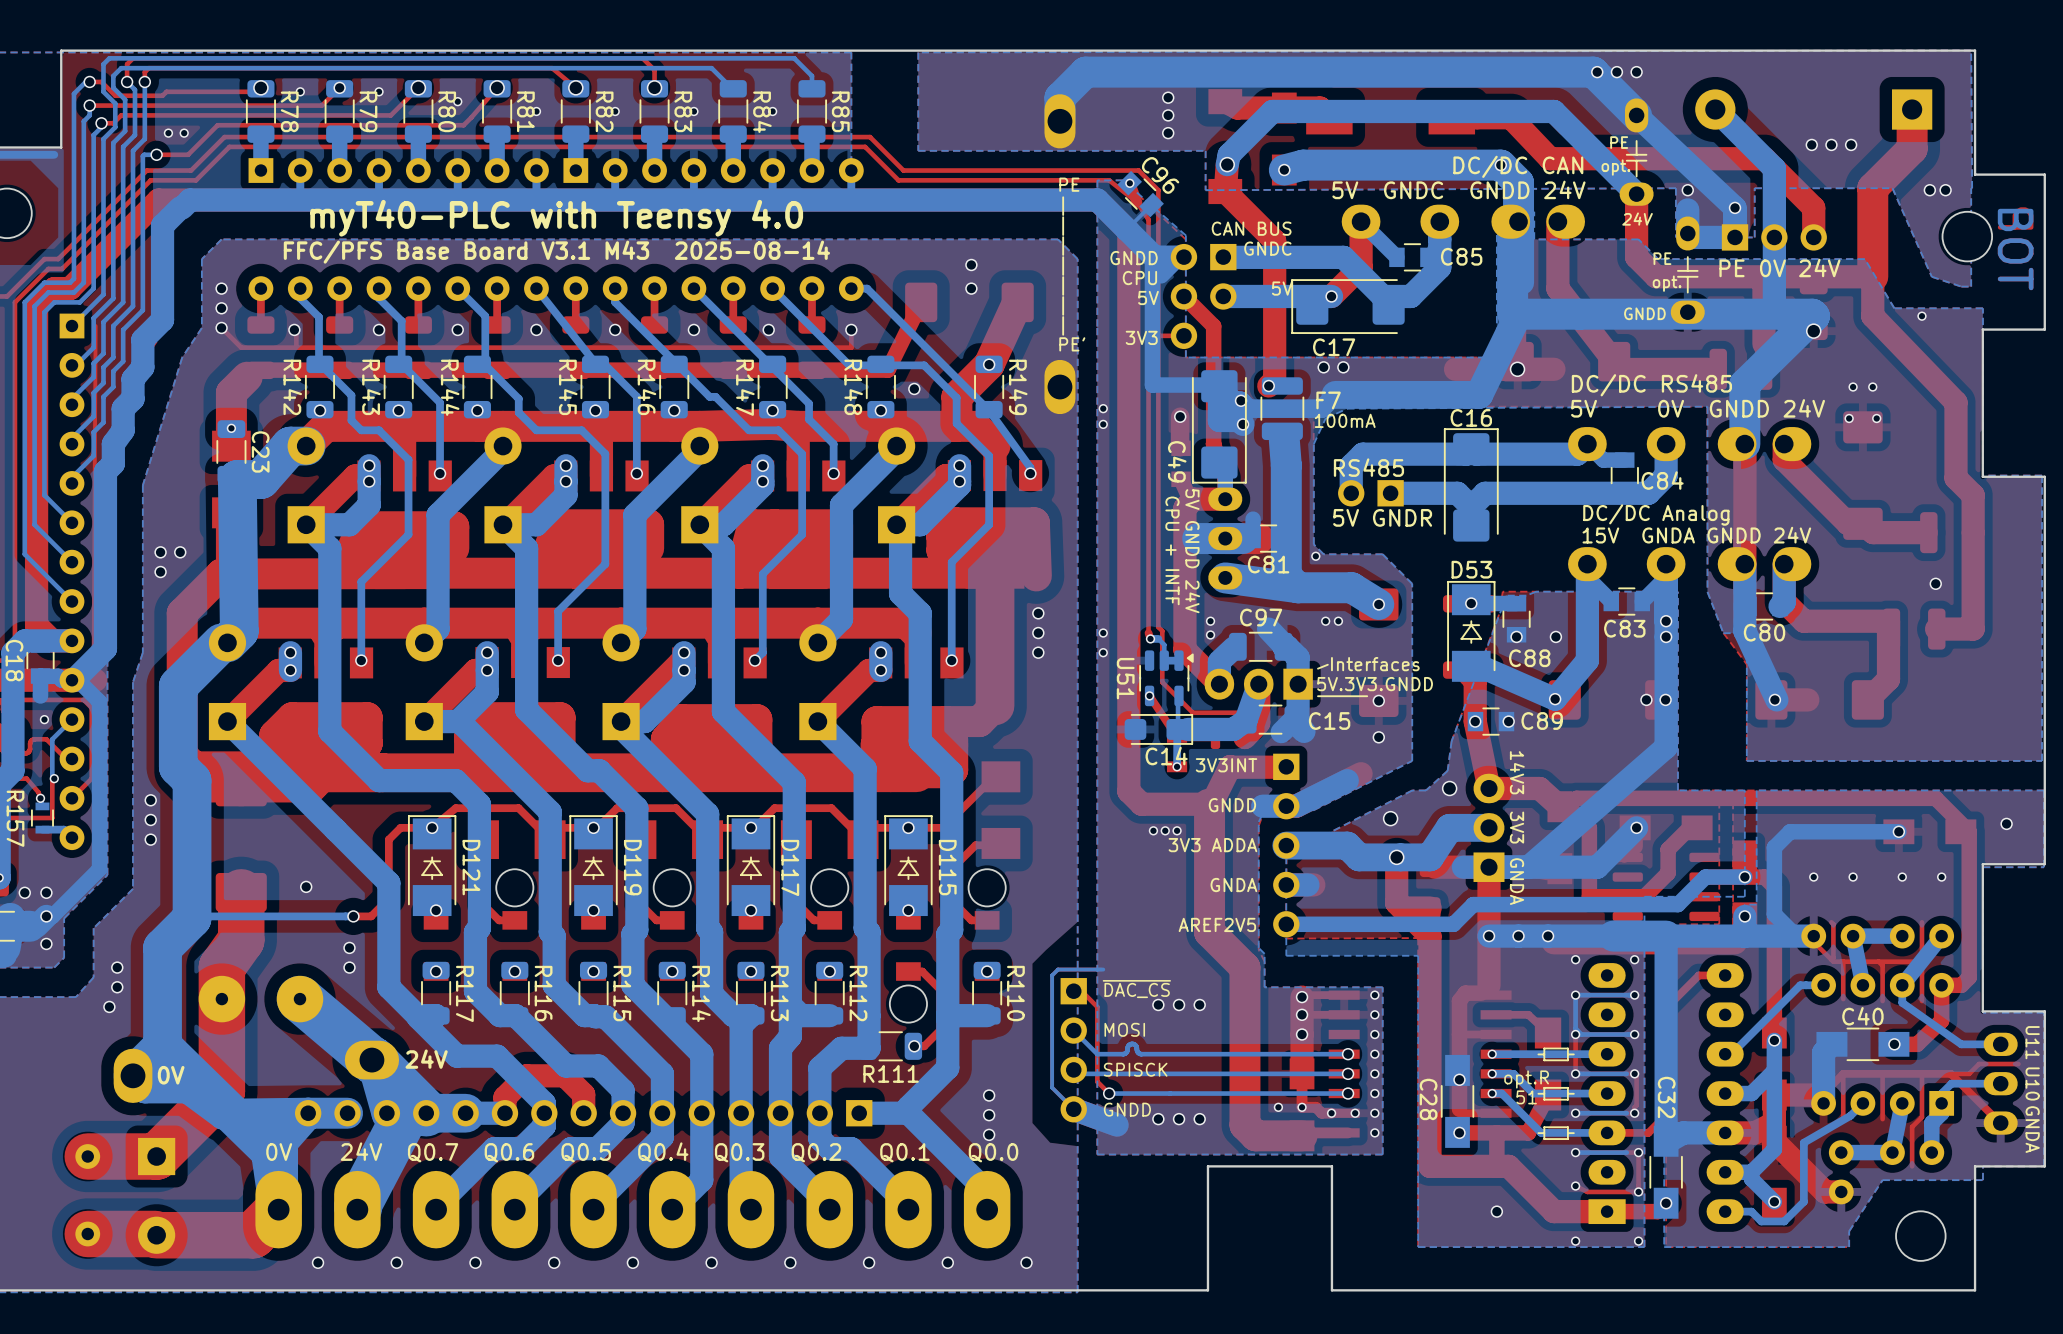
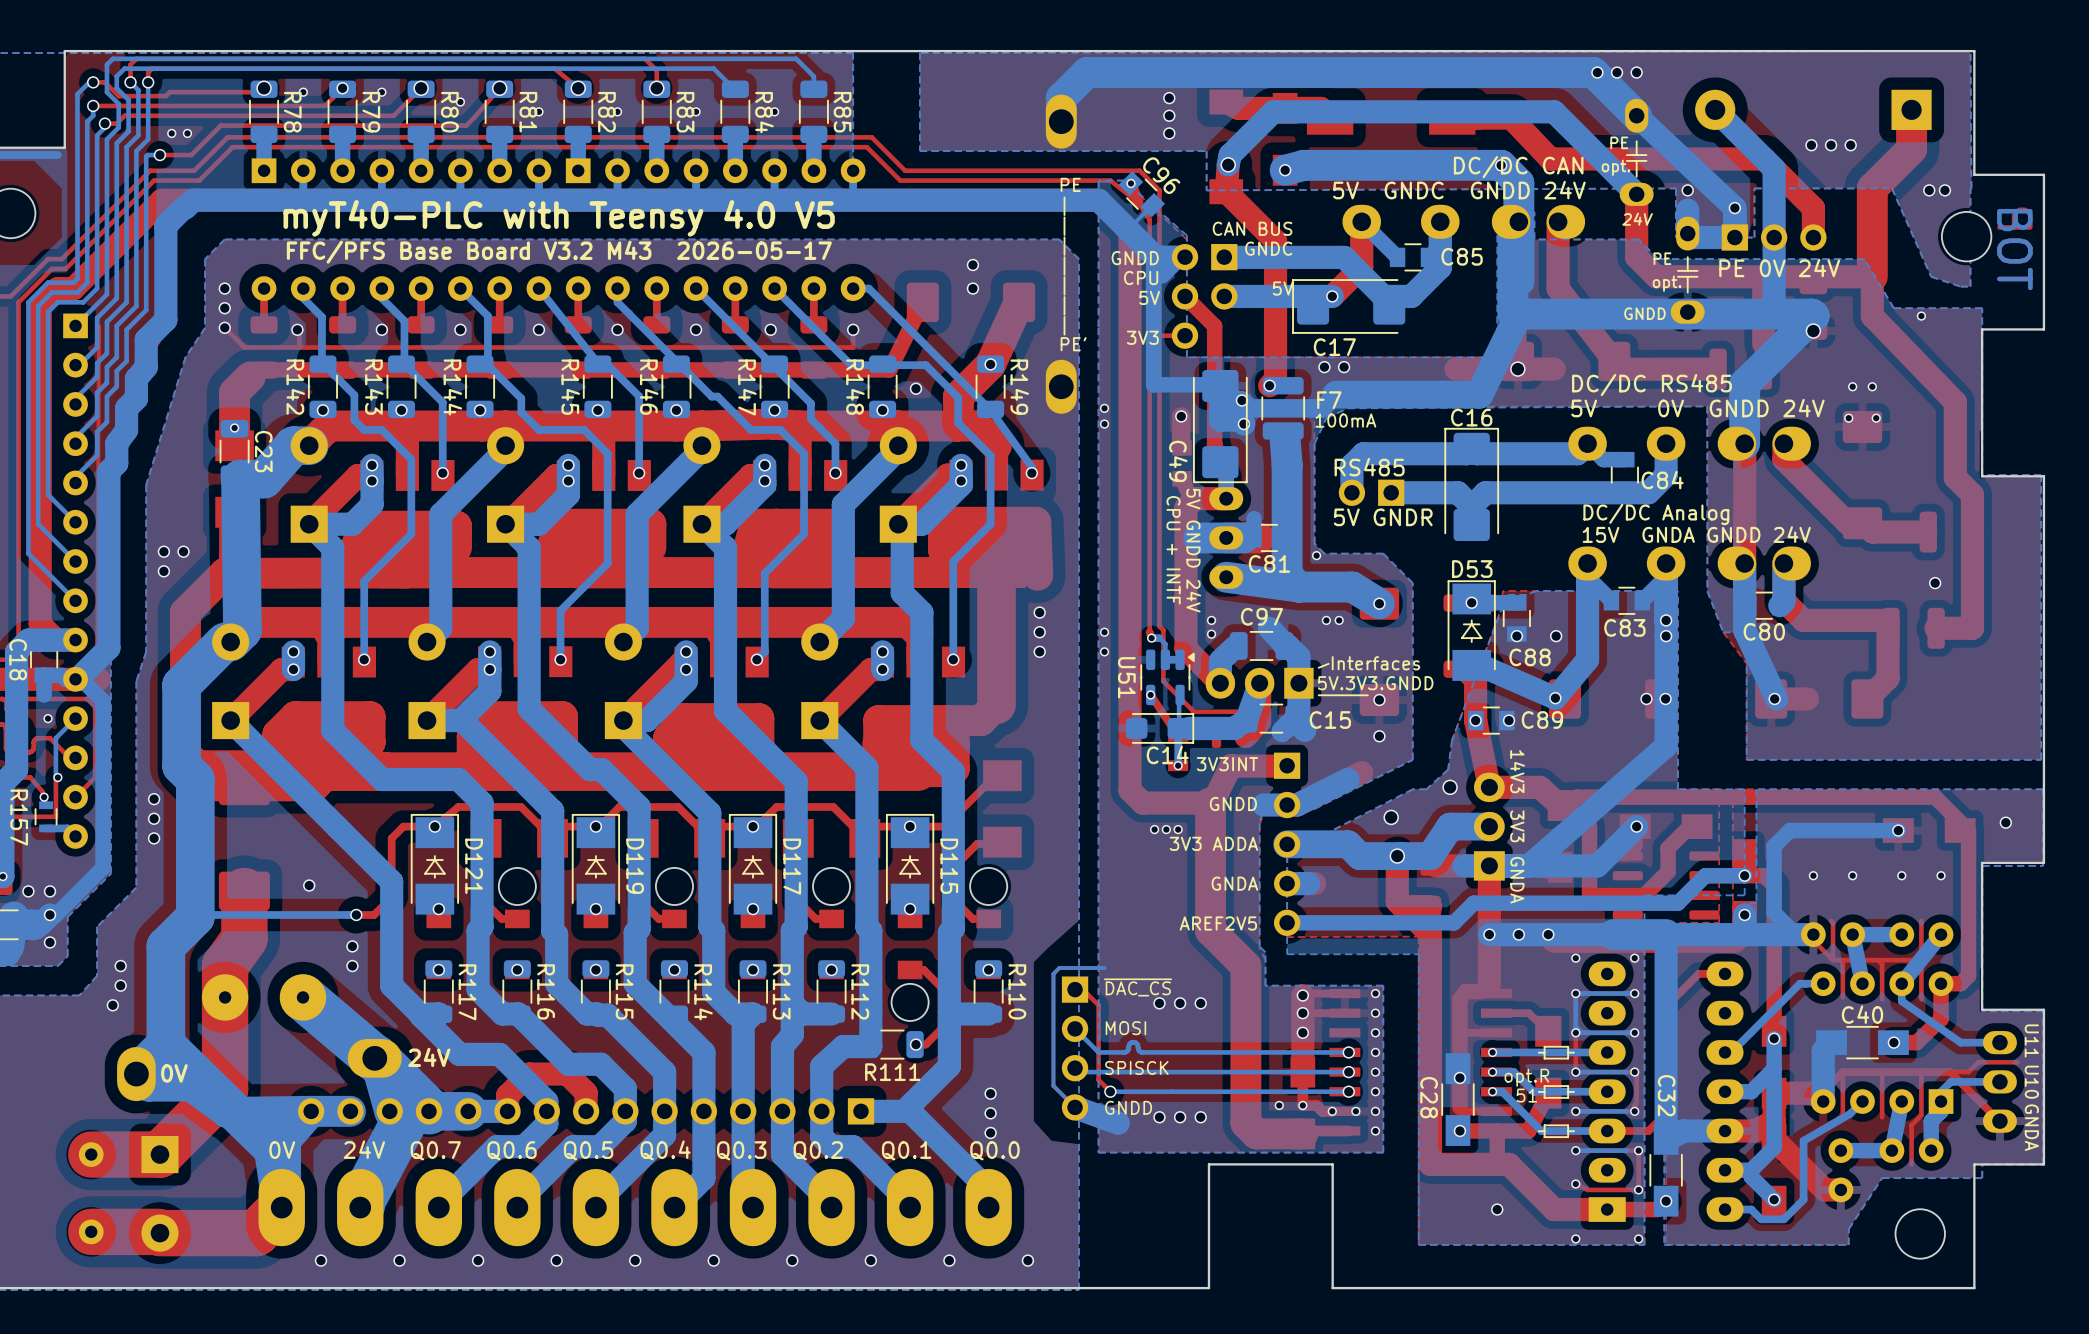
text: myT40-PLC with Teensy 4.0 (556, 218) -> myT40-PLC with Teensy 4.0 V5 (559, 218)
text: FFC/PFS Base Board V3.1 M43 2025-08-14 (556, 252) -> FFC/PFS Base Board V3.2 M43 2026-05-17 (559, 252)

